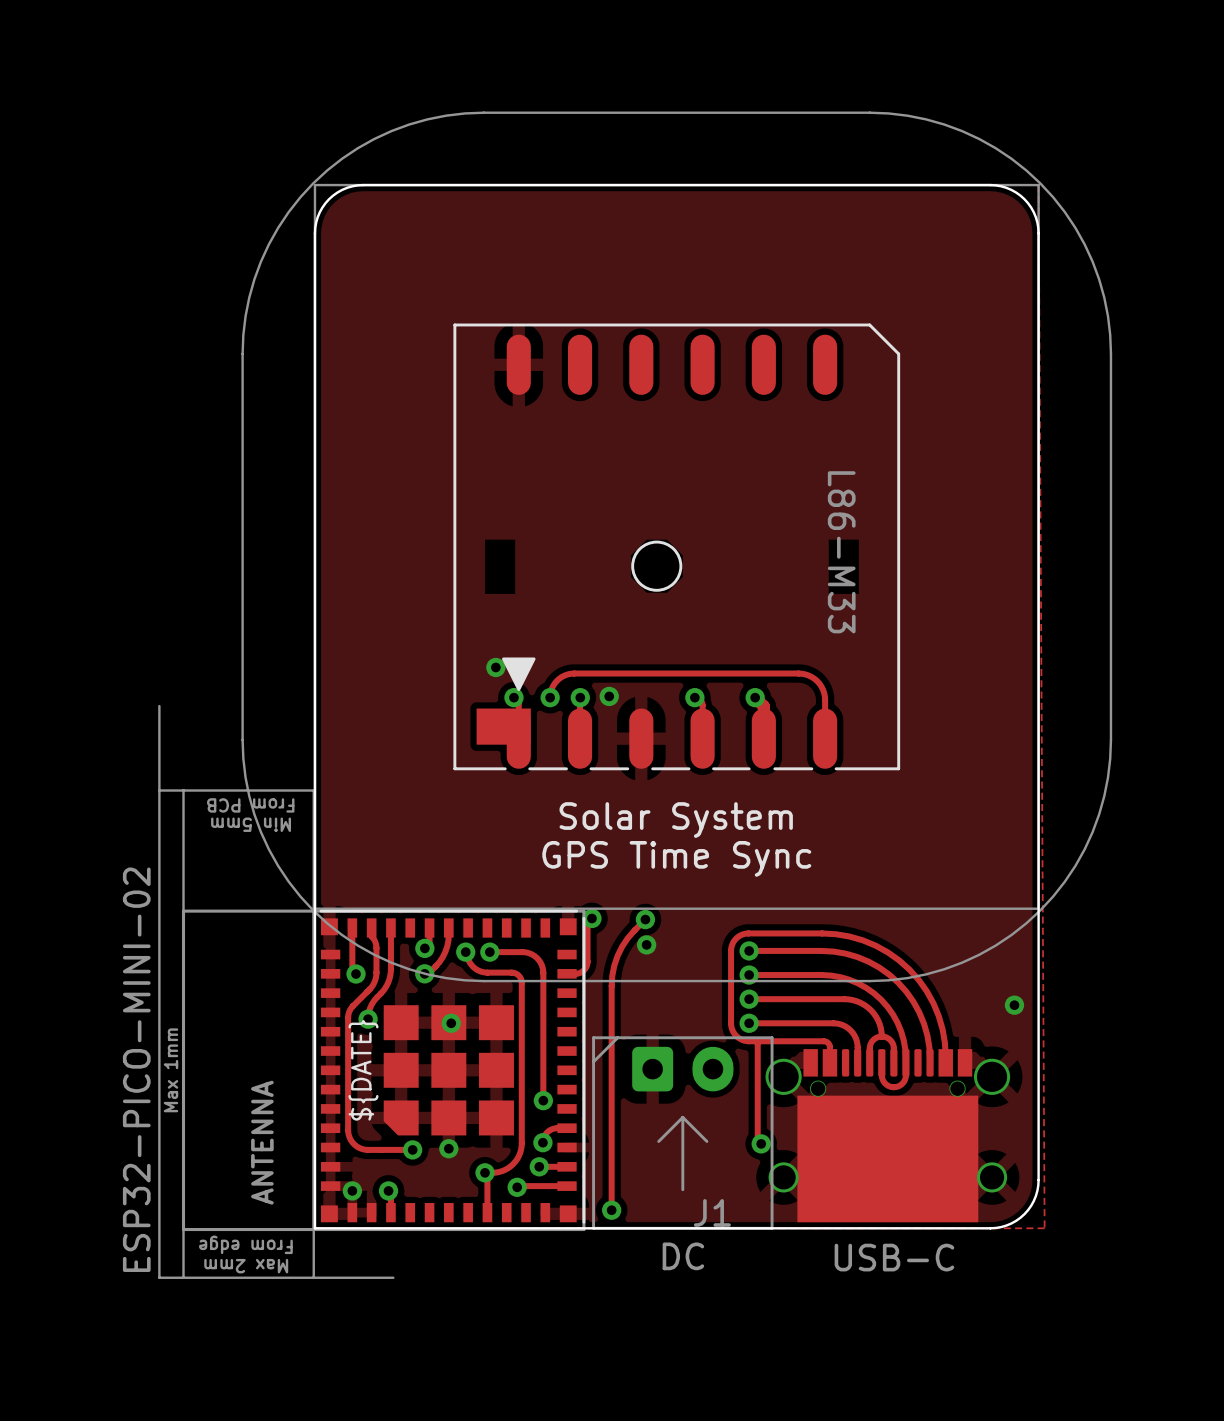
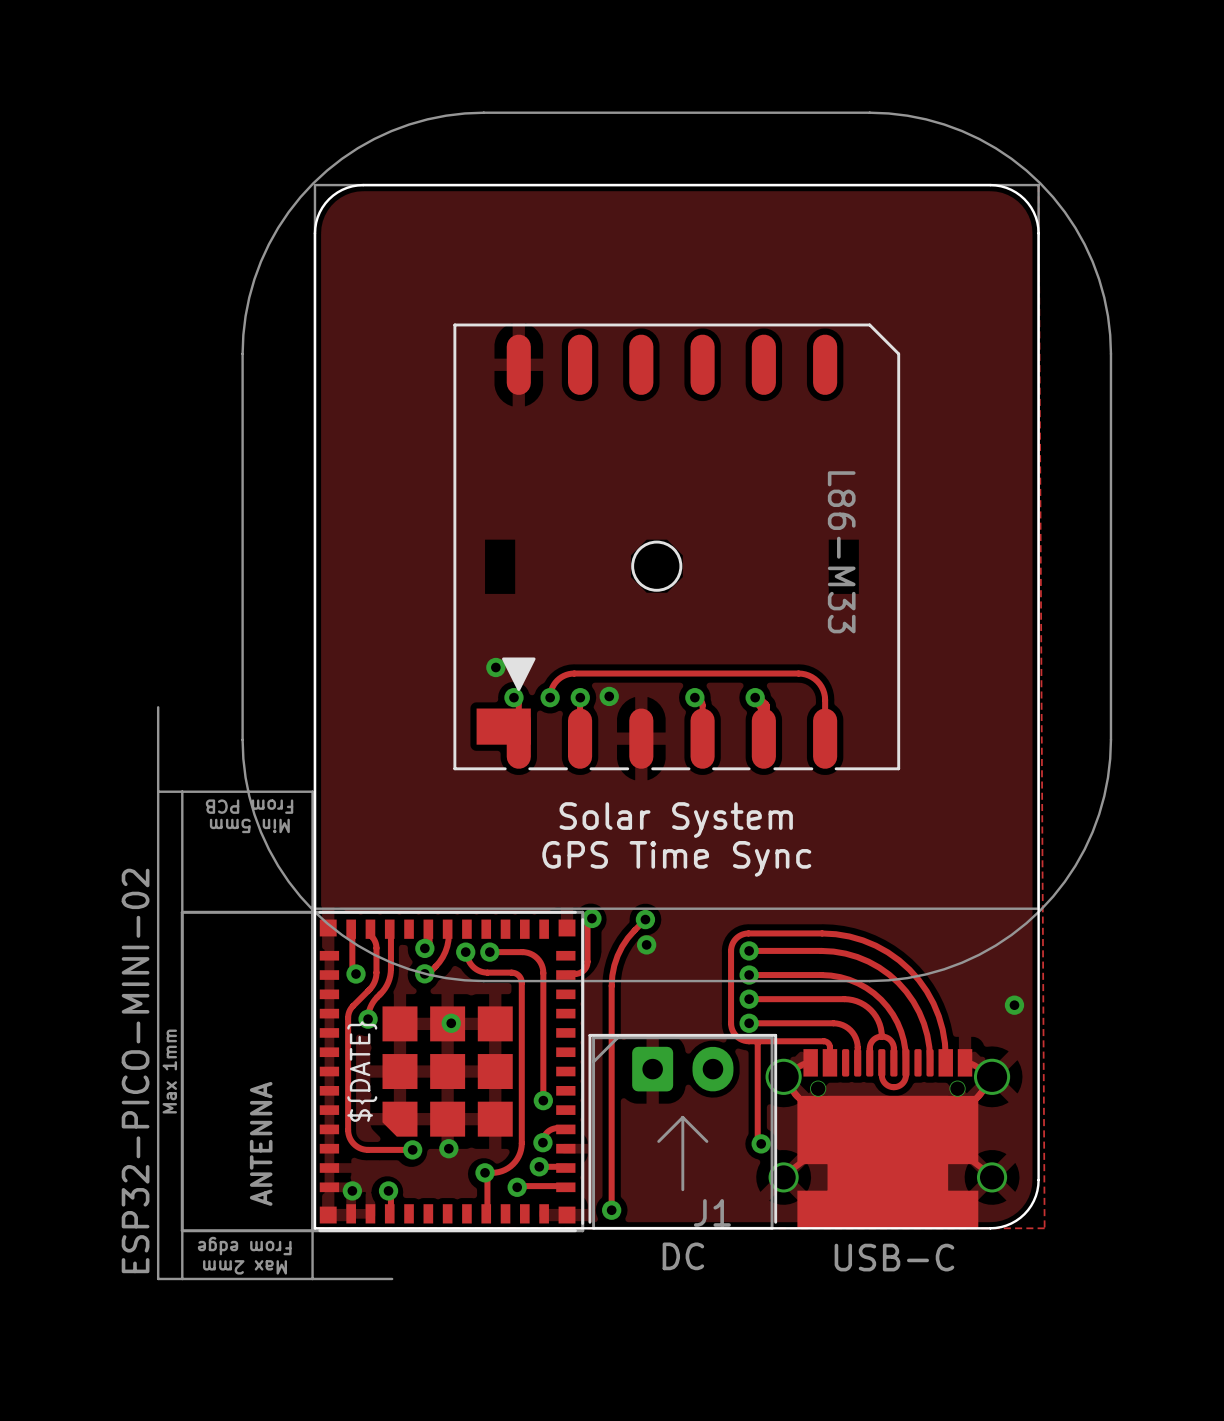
part footprint: [158, 704, 586, 1279] -> [156, 706, 585, 1281]
J1 footprint: [592, 1036, 774, 1230] -> [588, 1033, 778, 1230]
part footprint: [765, 1049, 1011, 1223] -> [765, 1049, 1011, 1229]

